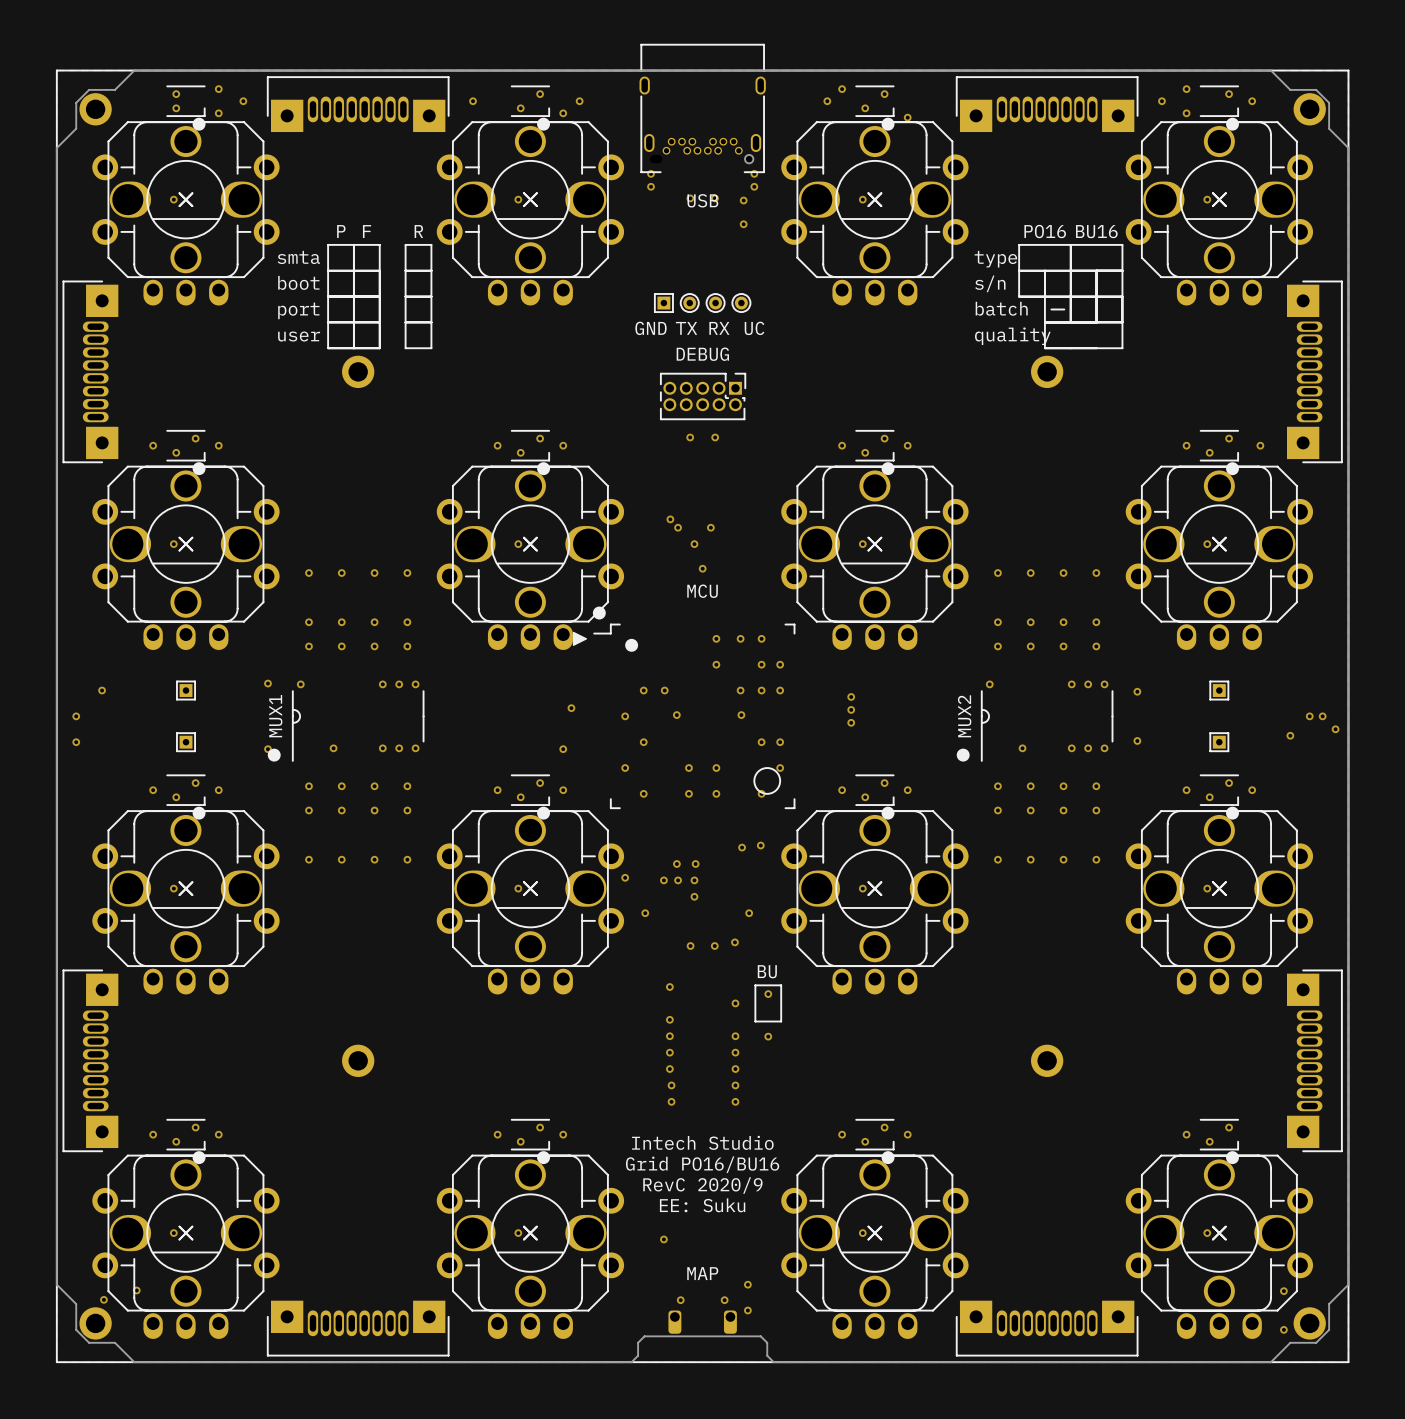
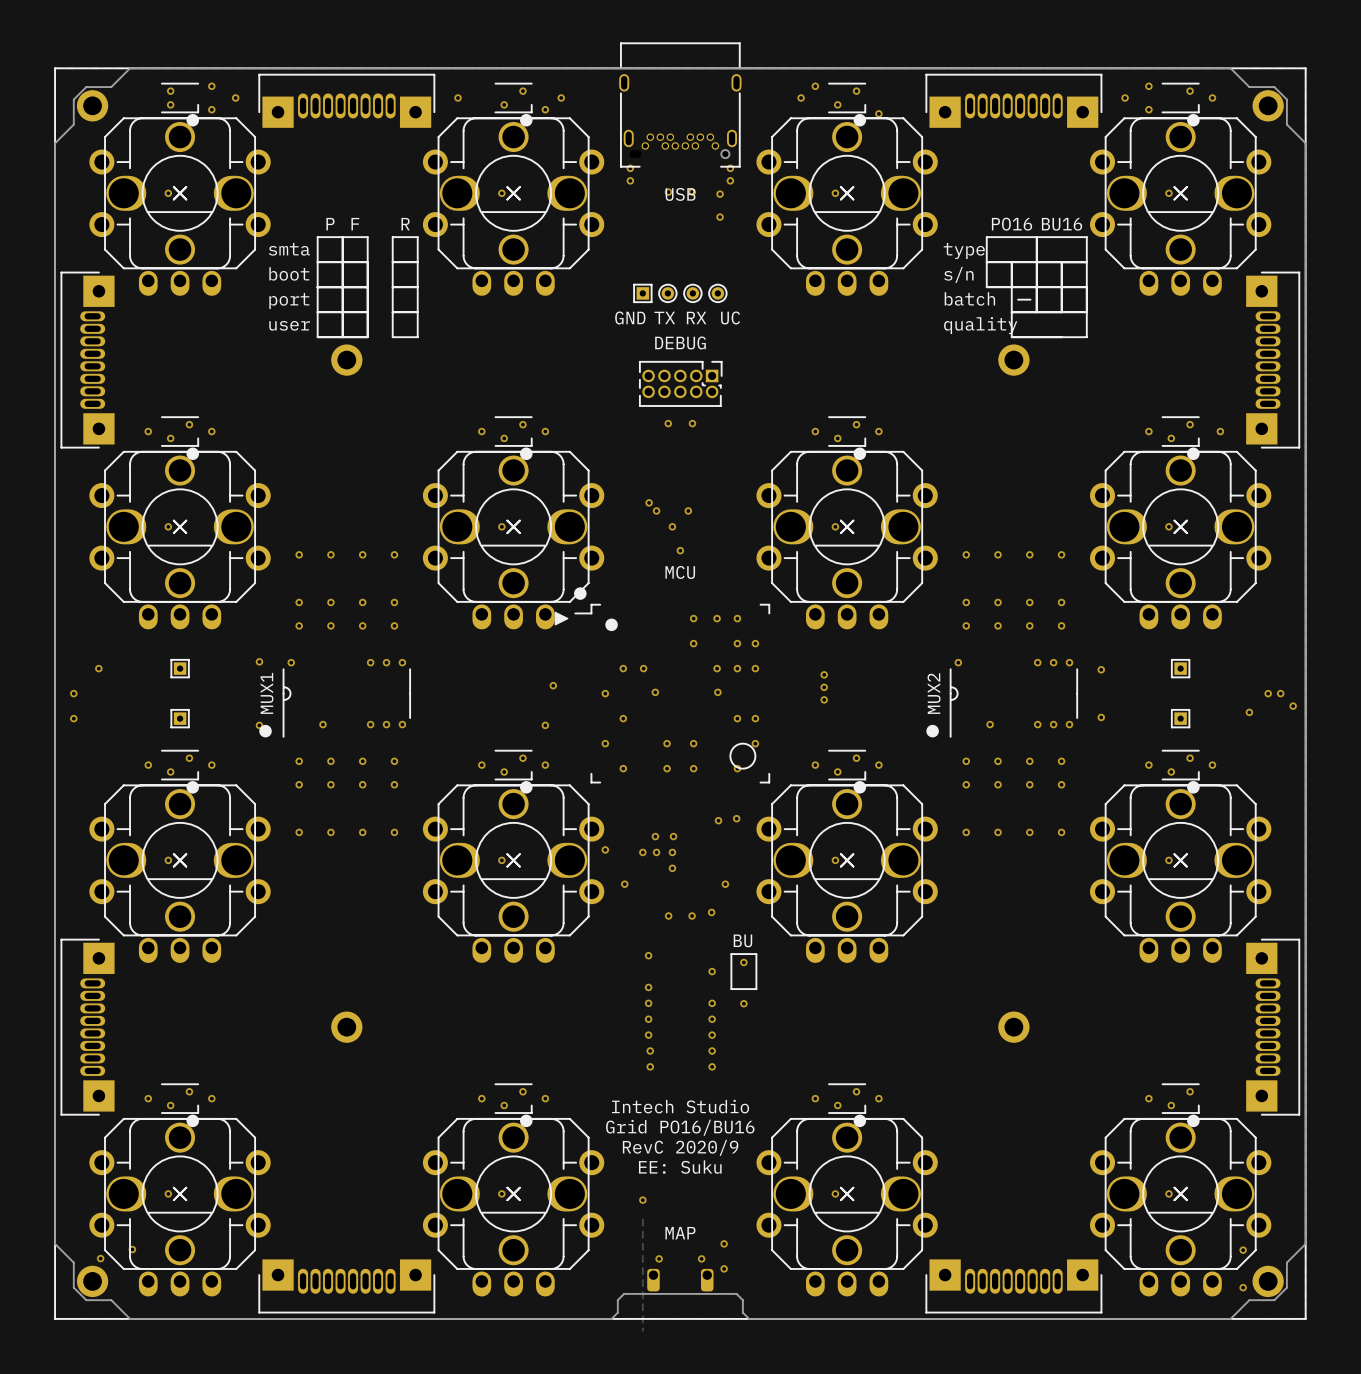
zone outline: none -> (642, 1218) (642, 1331)

